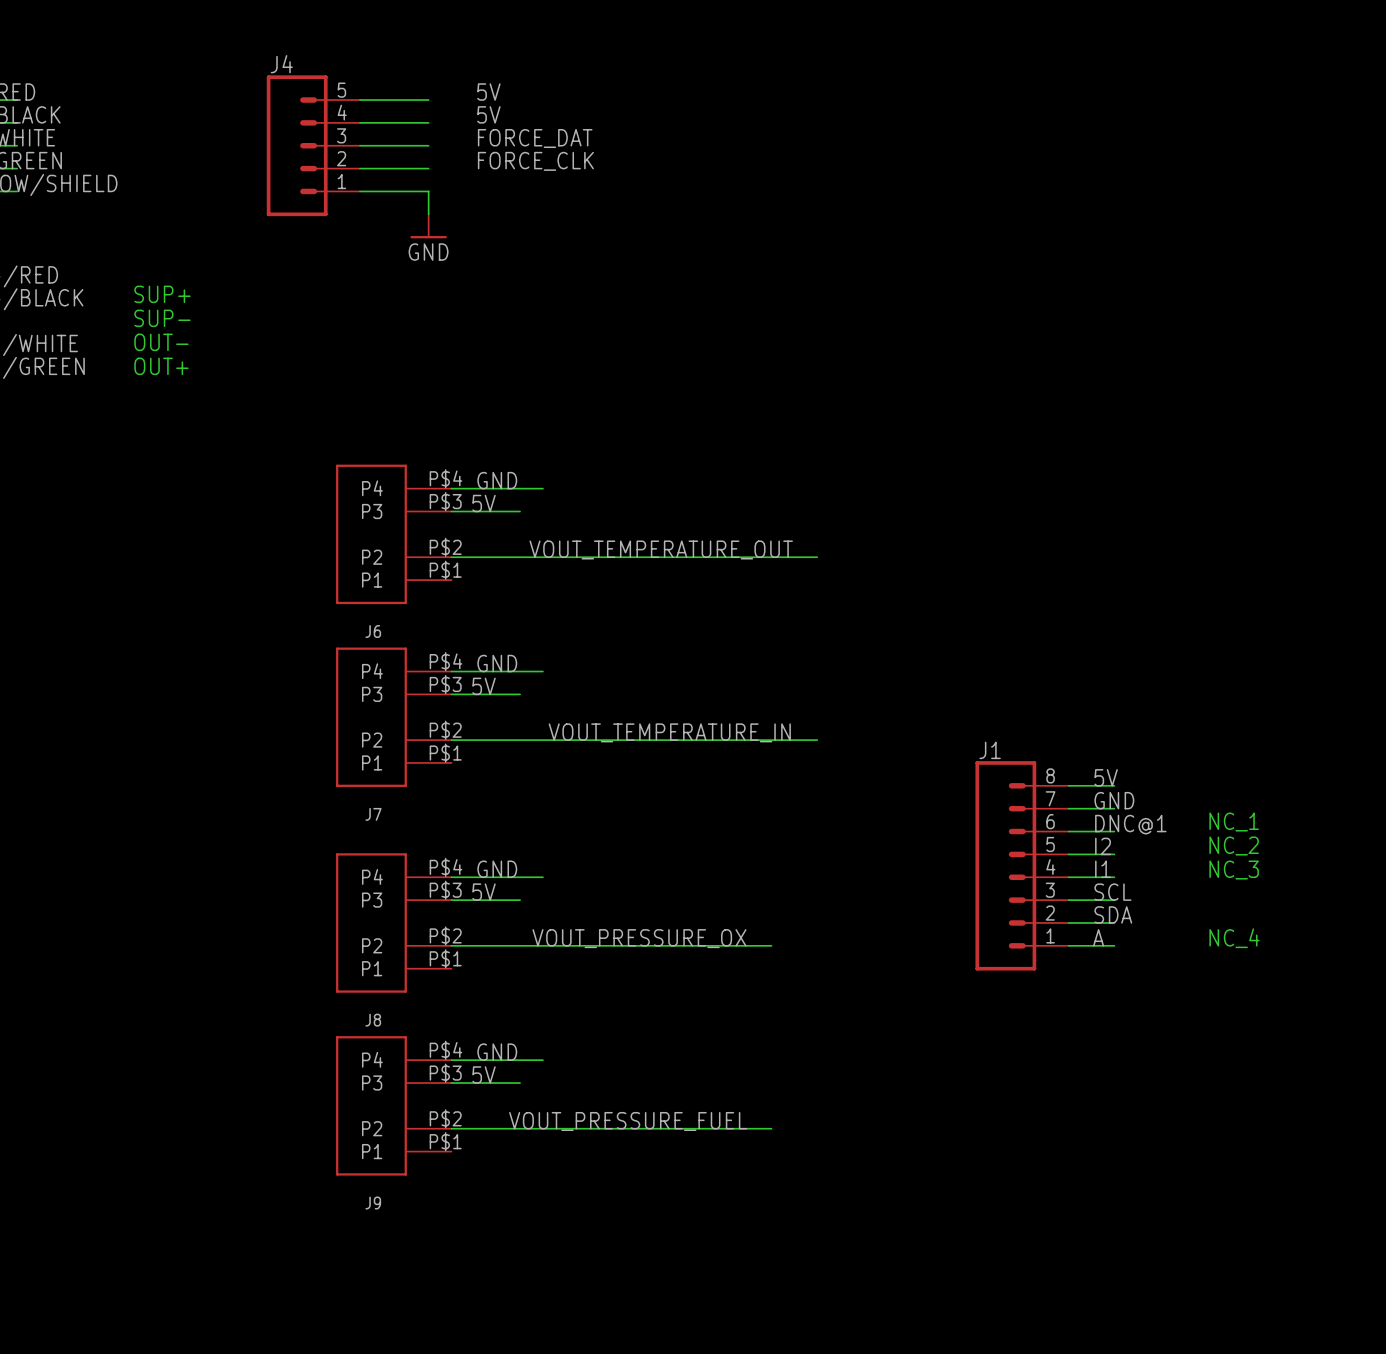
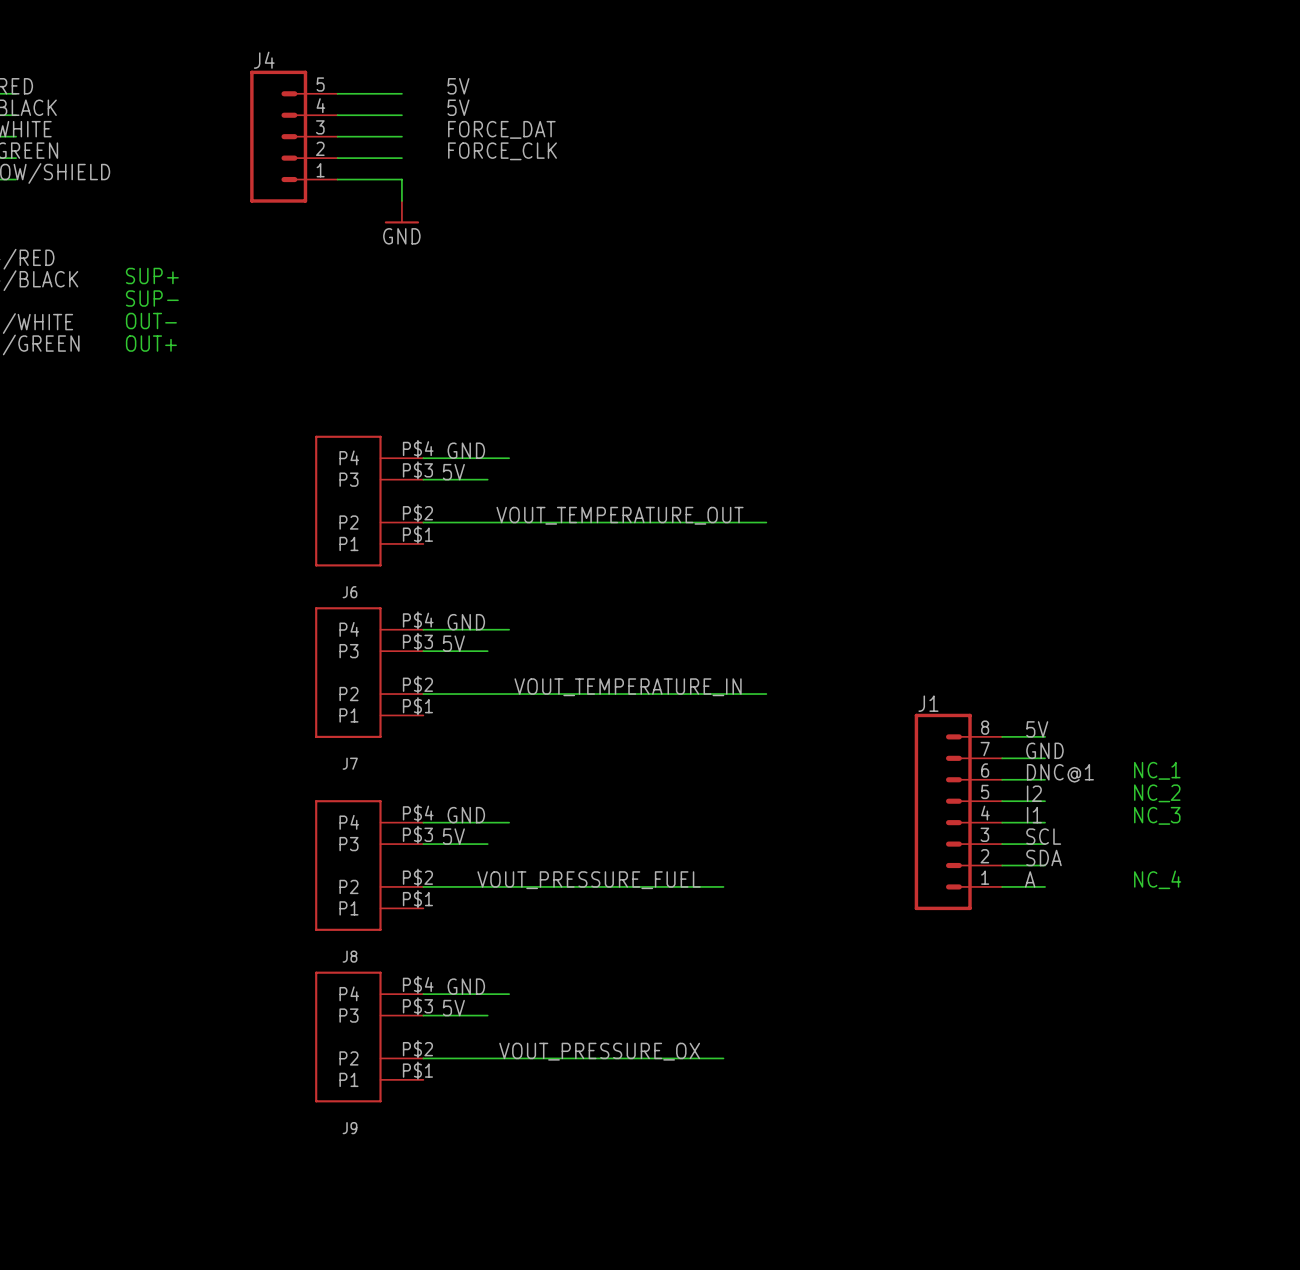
label: VOUT_PRESSURE_OX (639, 938) -> VOUT_PRESSURE_FUEL (589, 880)
label: VOUT_PRESSURE_FUEL (628, 1121) -> VOUT_PRESSURE_OX (599, 1051)

